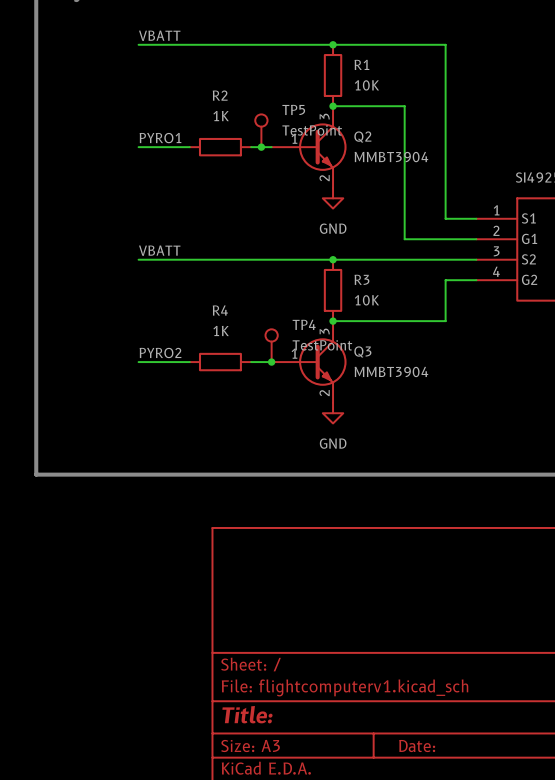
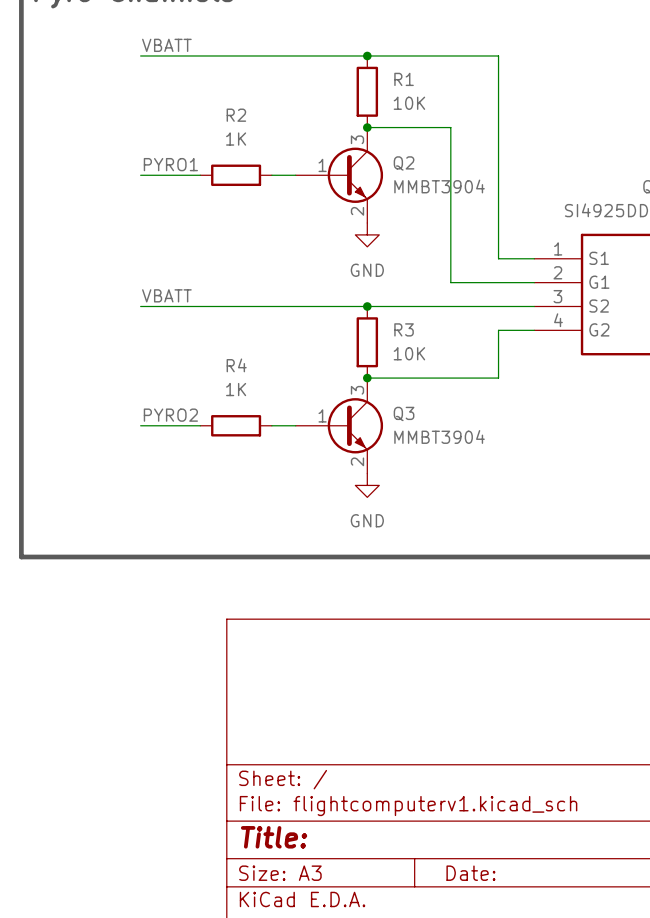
TP5: TestPoint (261, 130) -> none
junction: (261, 147) -> none
TP4: TestPoint (271, 345) -> none
junction: (271, 362) -> none

